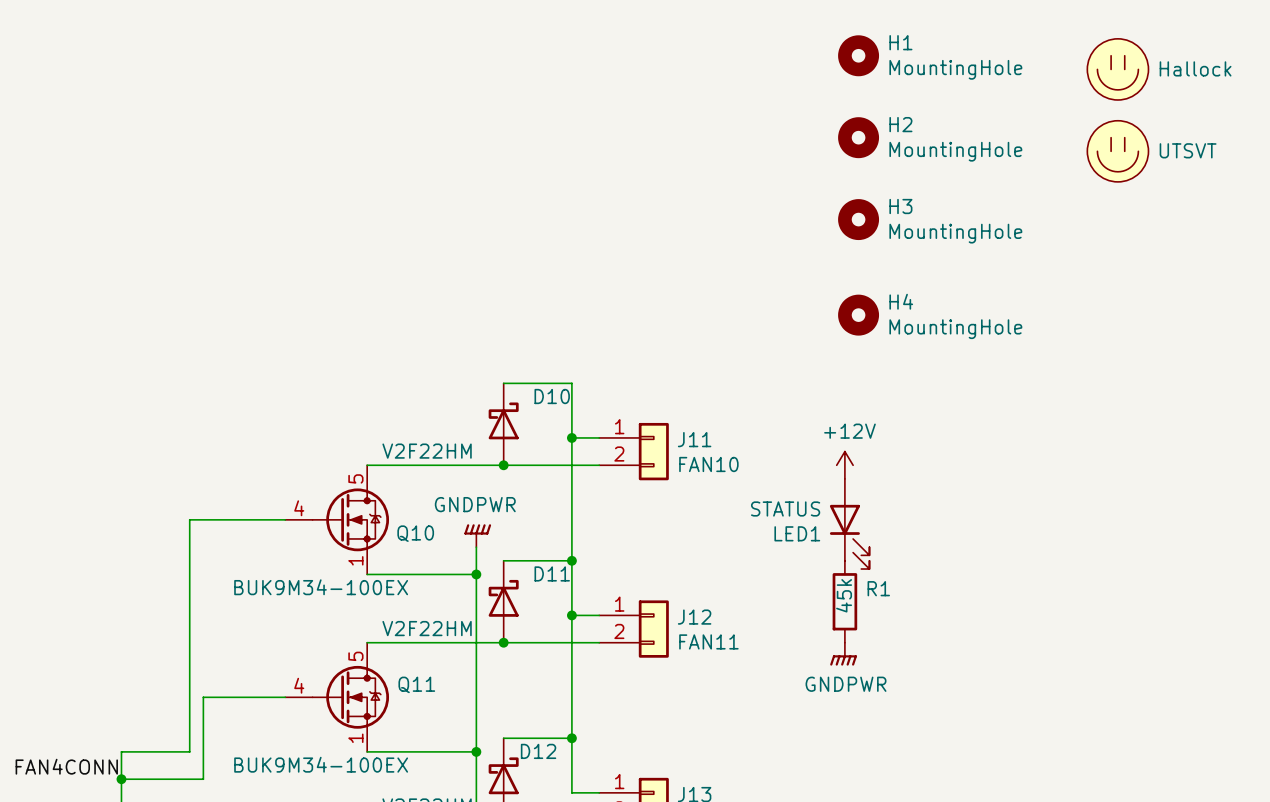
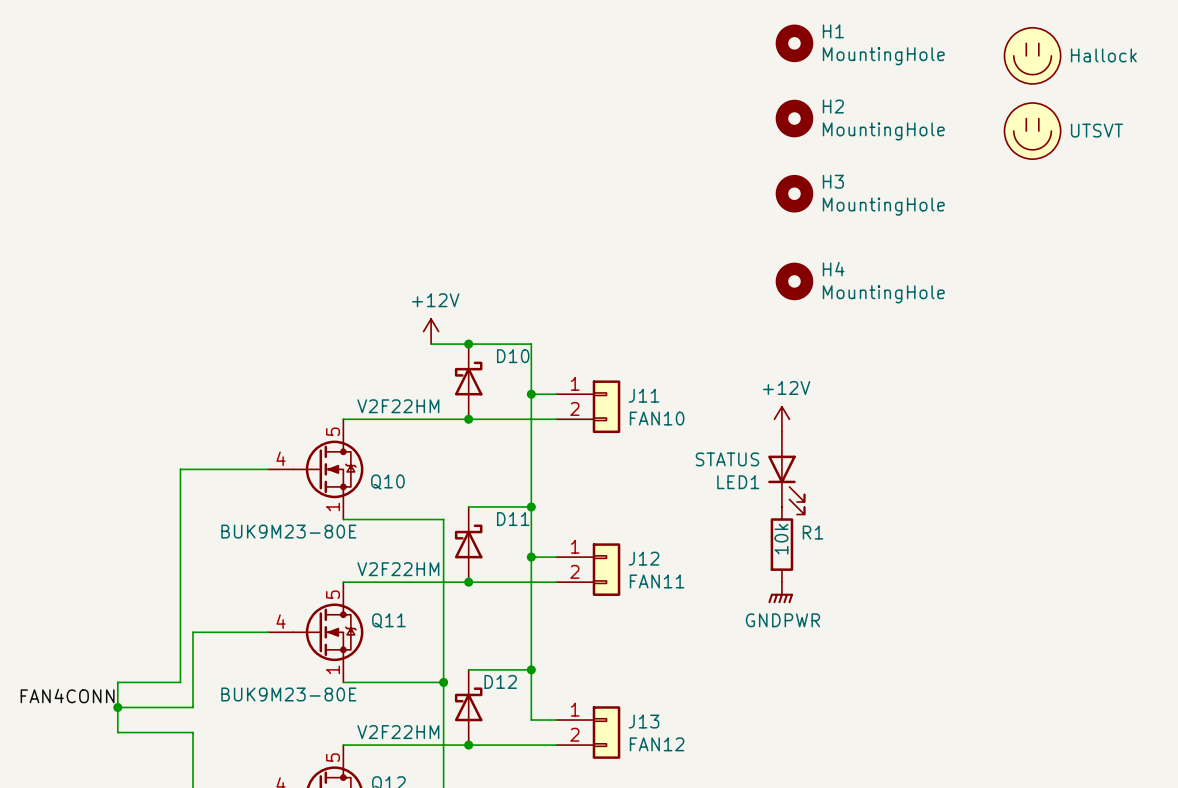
power symbol: none -> +12V (431, 331)
wire: none -> (431, 344) (468, 344)
junction: none -> (468, 344)
power symbol: GNDPWR (477, 535) -> none
wire: (476, 547) (476, 574) -> none
junction: (476, 574) -> none
Q10 value: BUK9M34-100EX (321, 587) -> BUK9M23-80E (288, 531)
R1 value: 45k (844, 595) -> 10k (781, 539)
Q11 value: BUK9M34-100EX (321, 764) -> BUK9M23-80E (288, 694)

